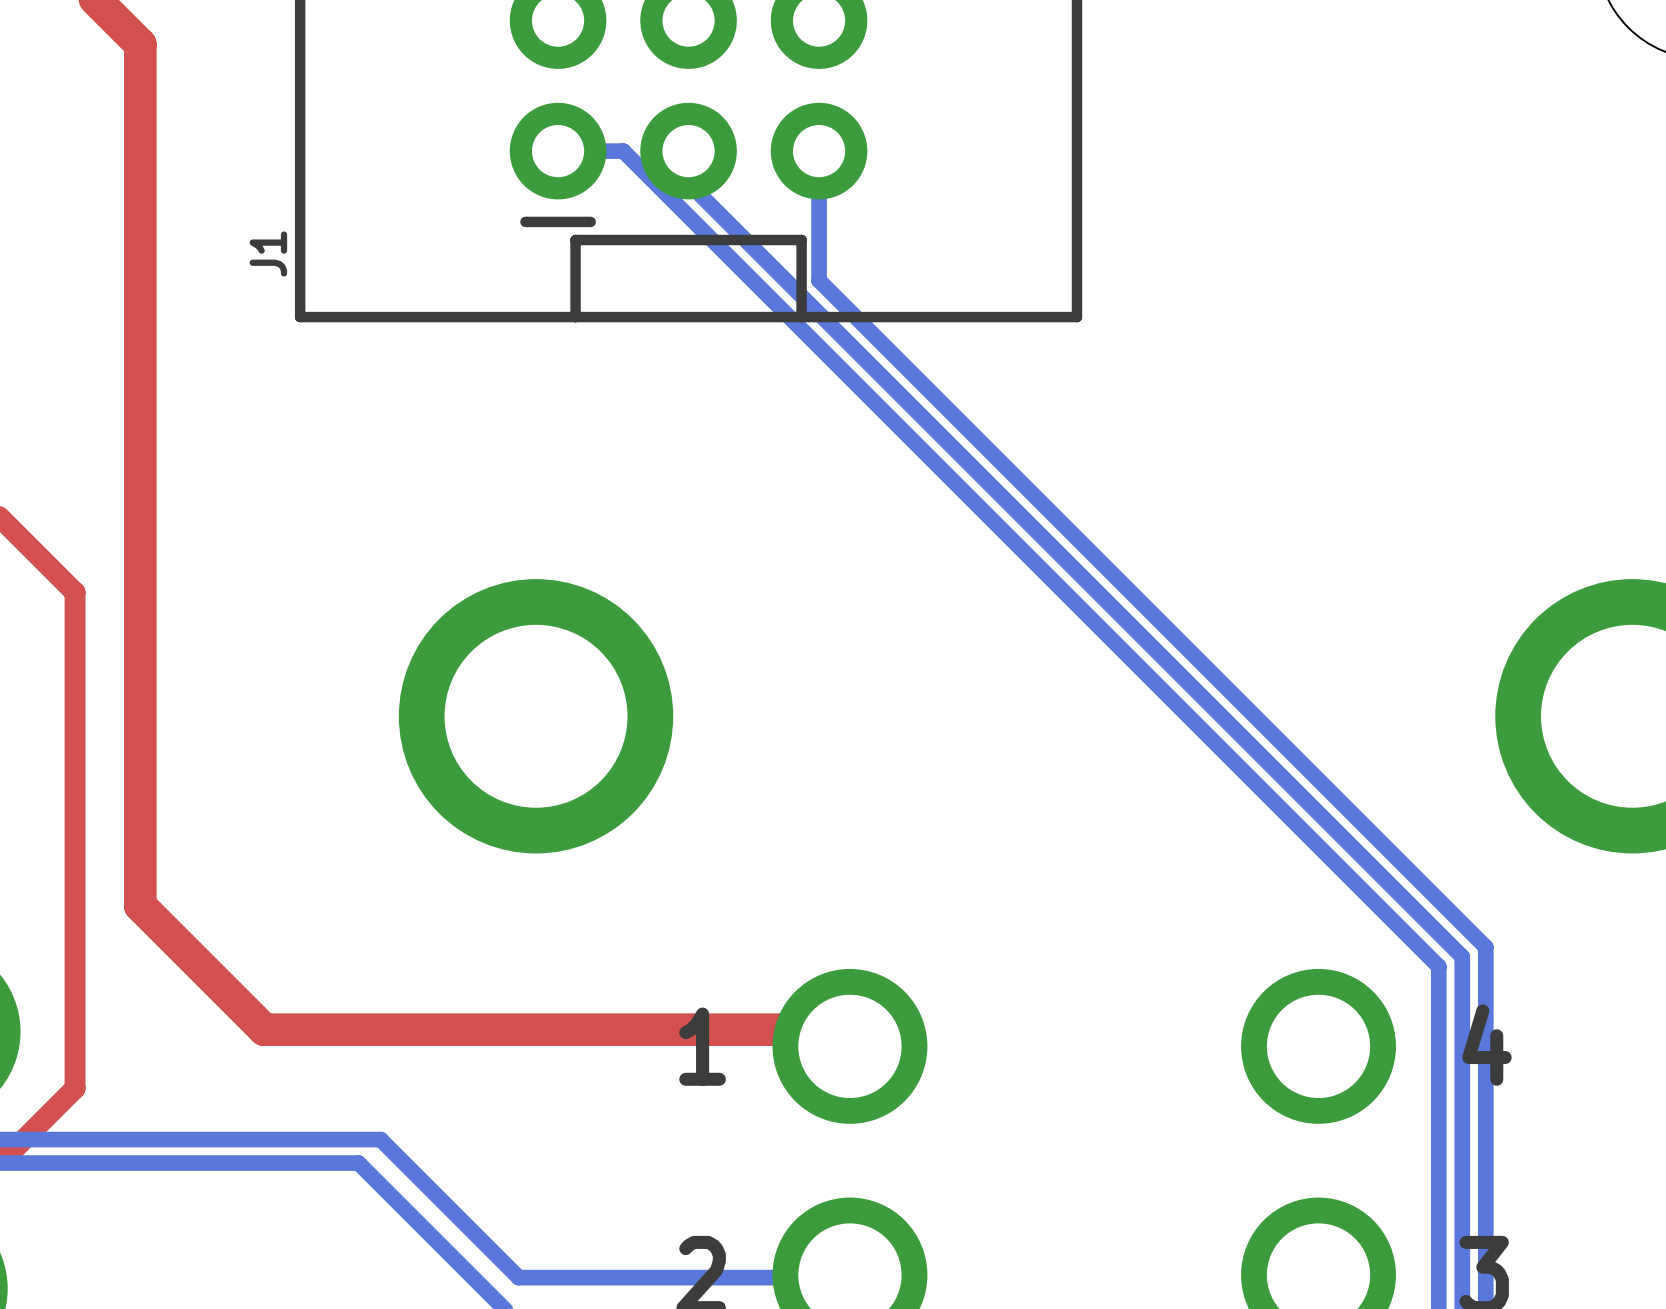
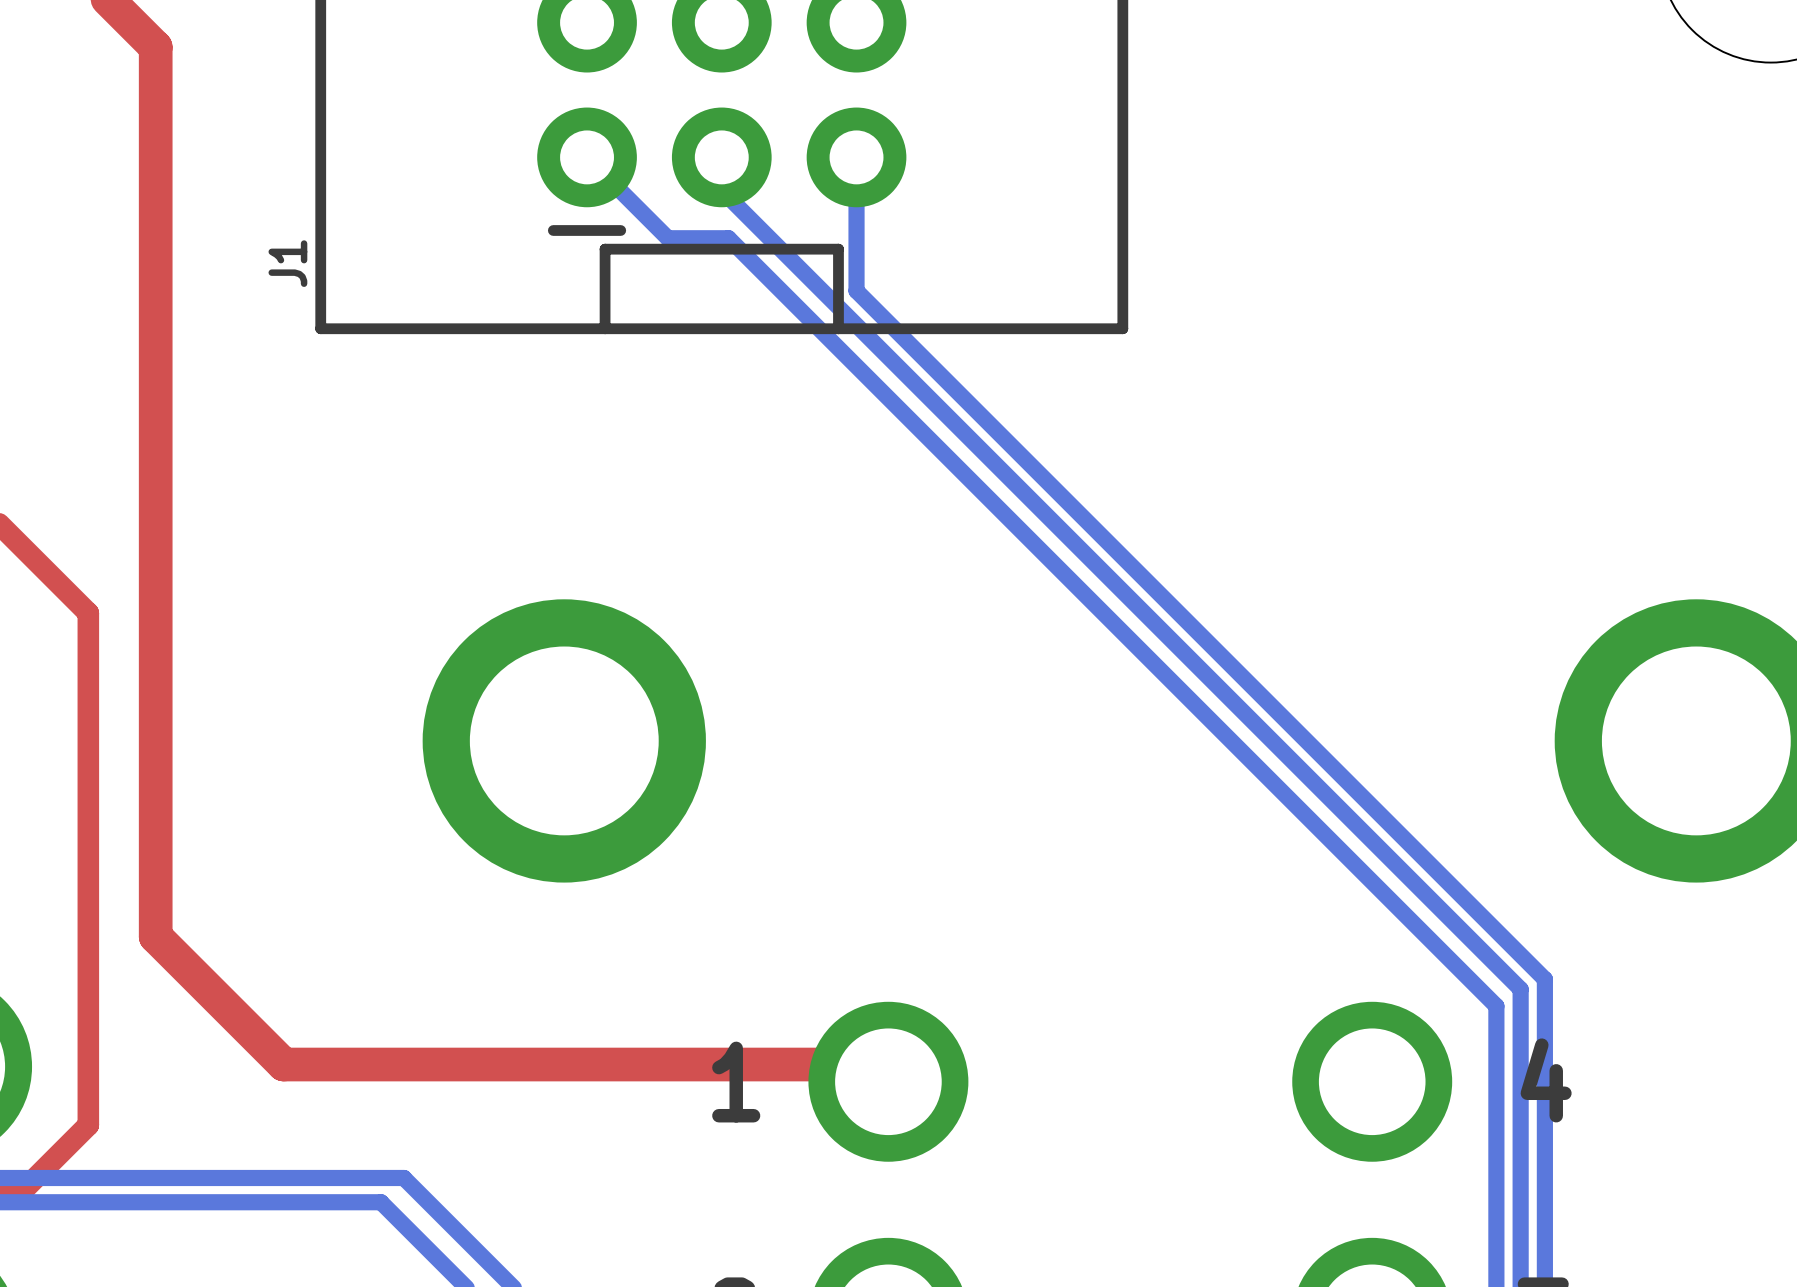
bottom track: (558, 151) (623, 151) (1438, 966) (1438, 973) -> (587, 157) (667, 238) (728, 238) (1496, 1006)

